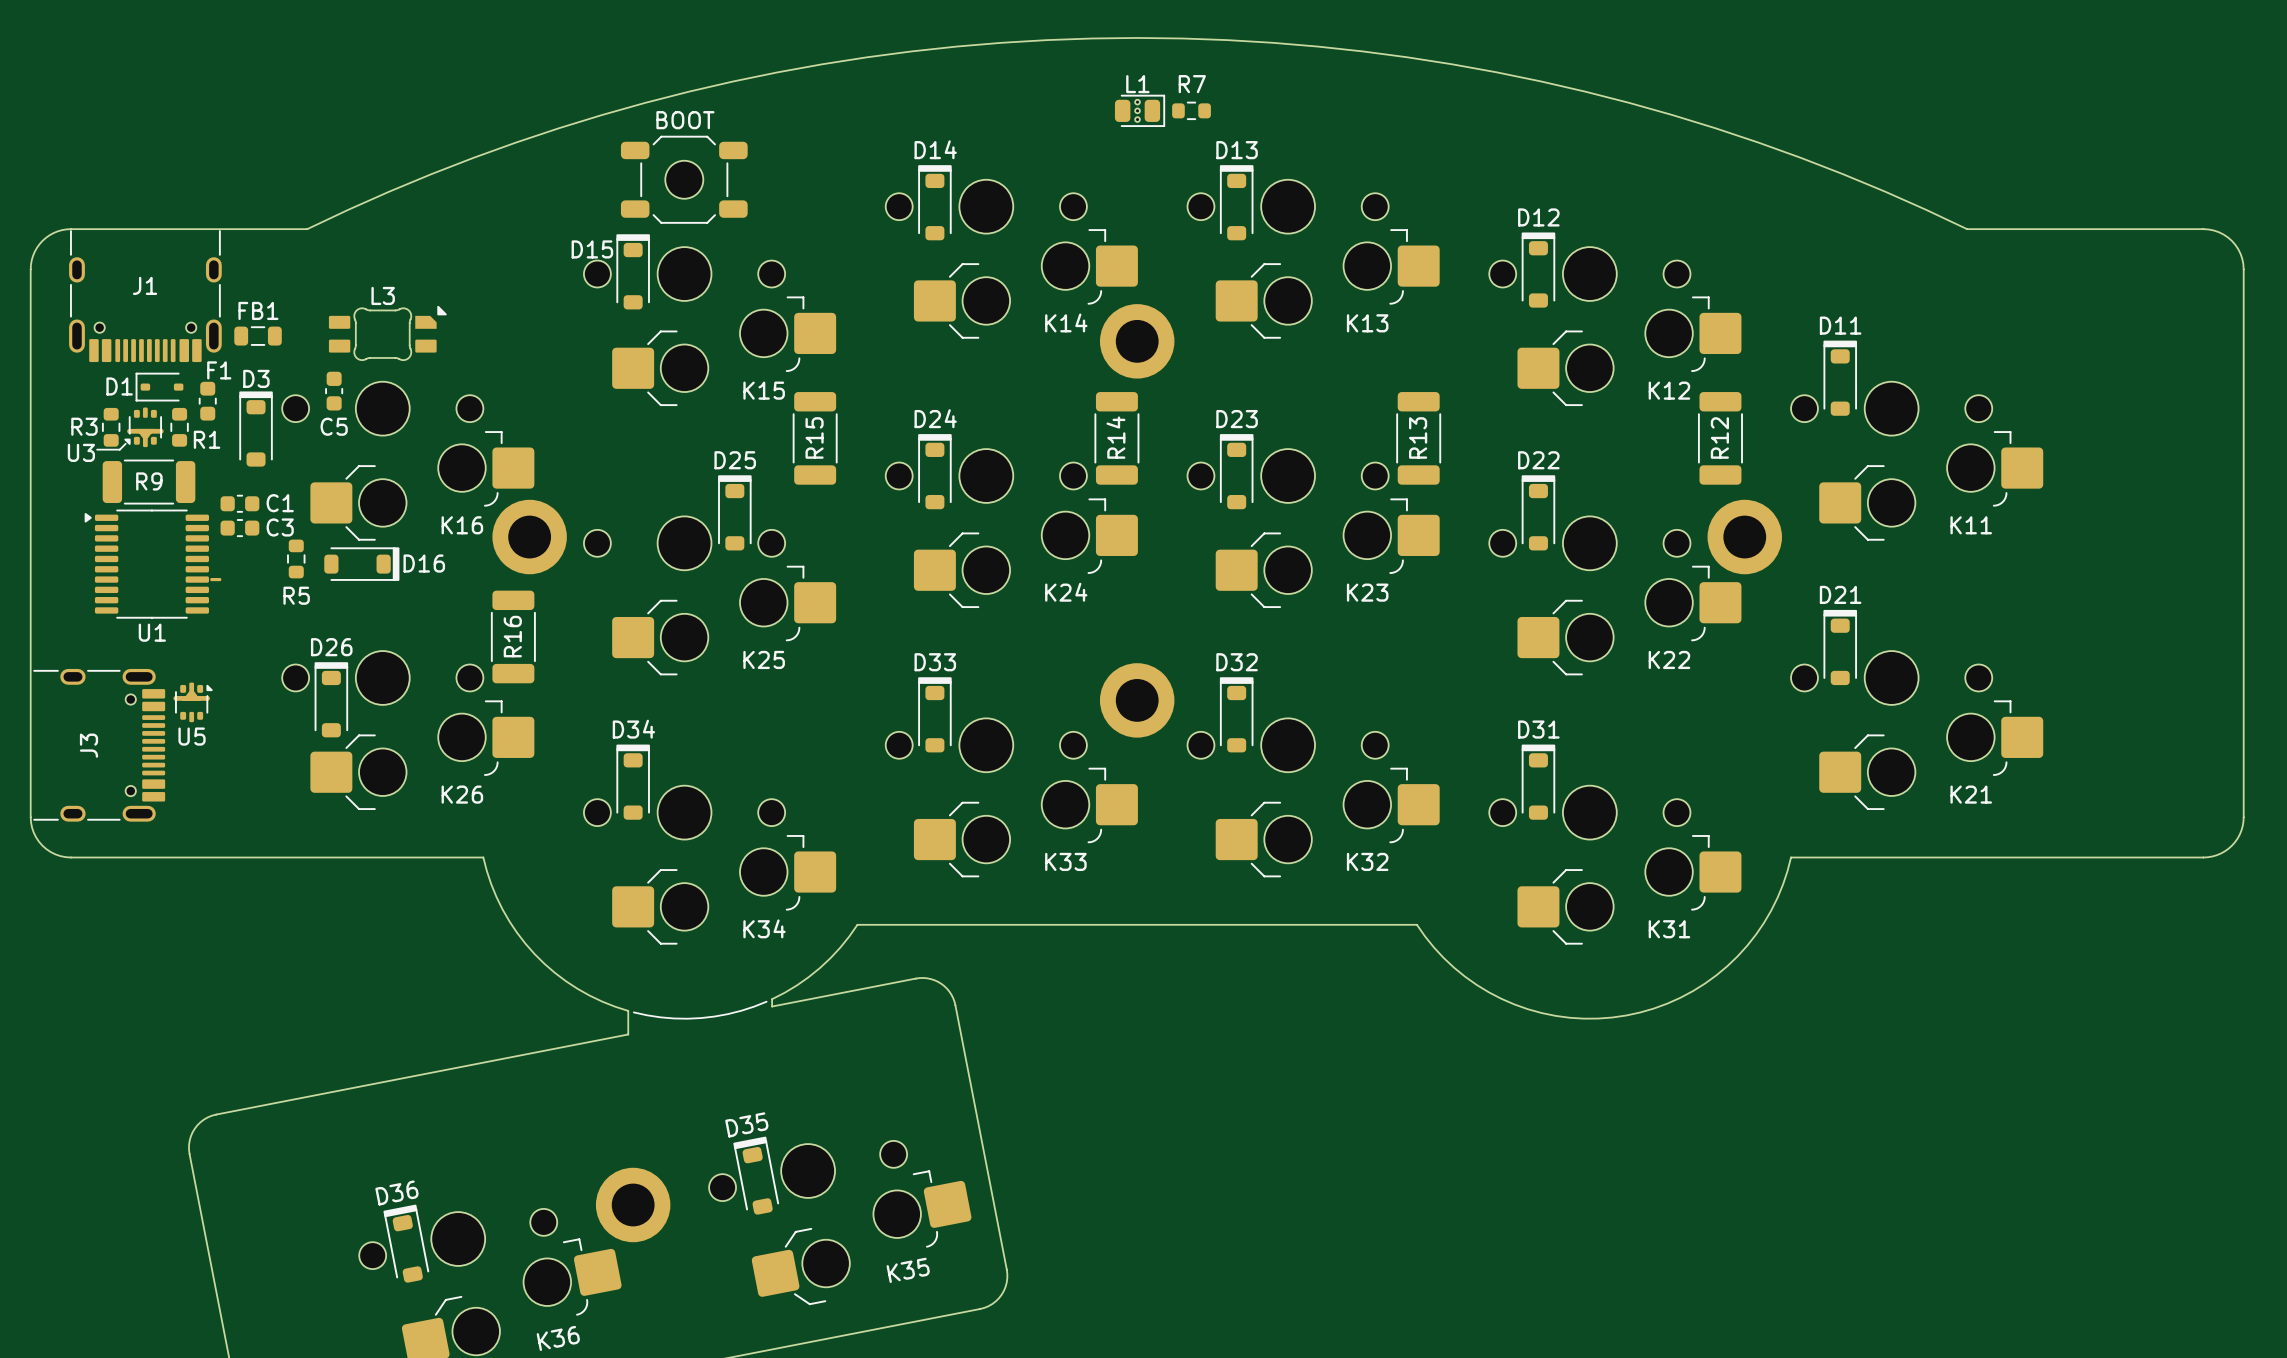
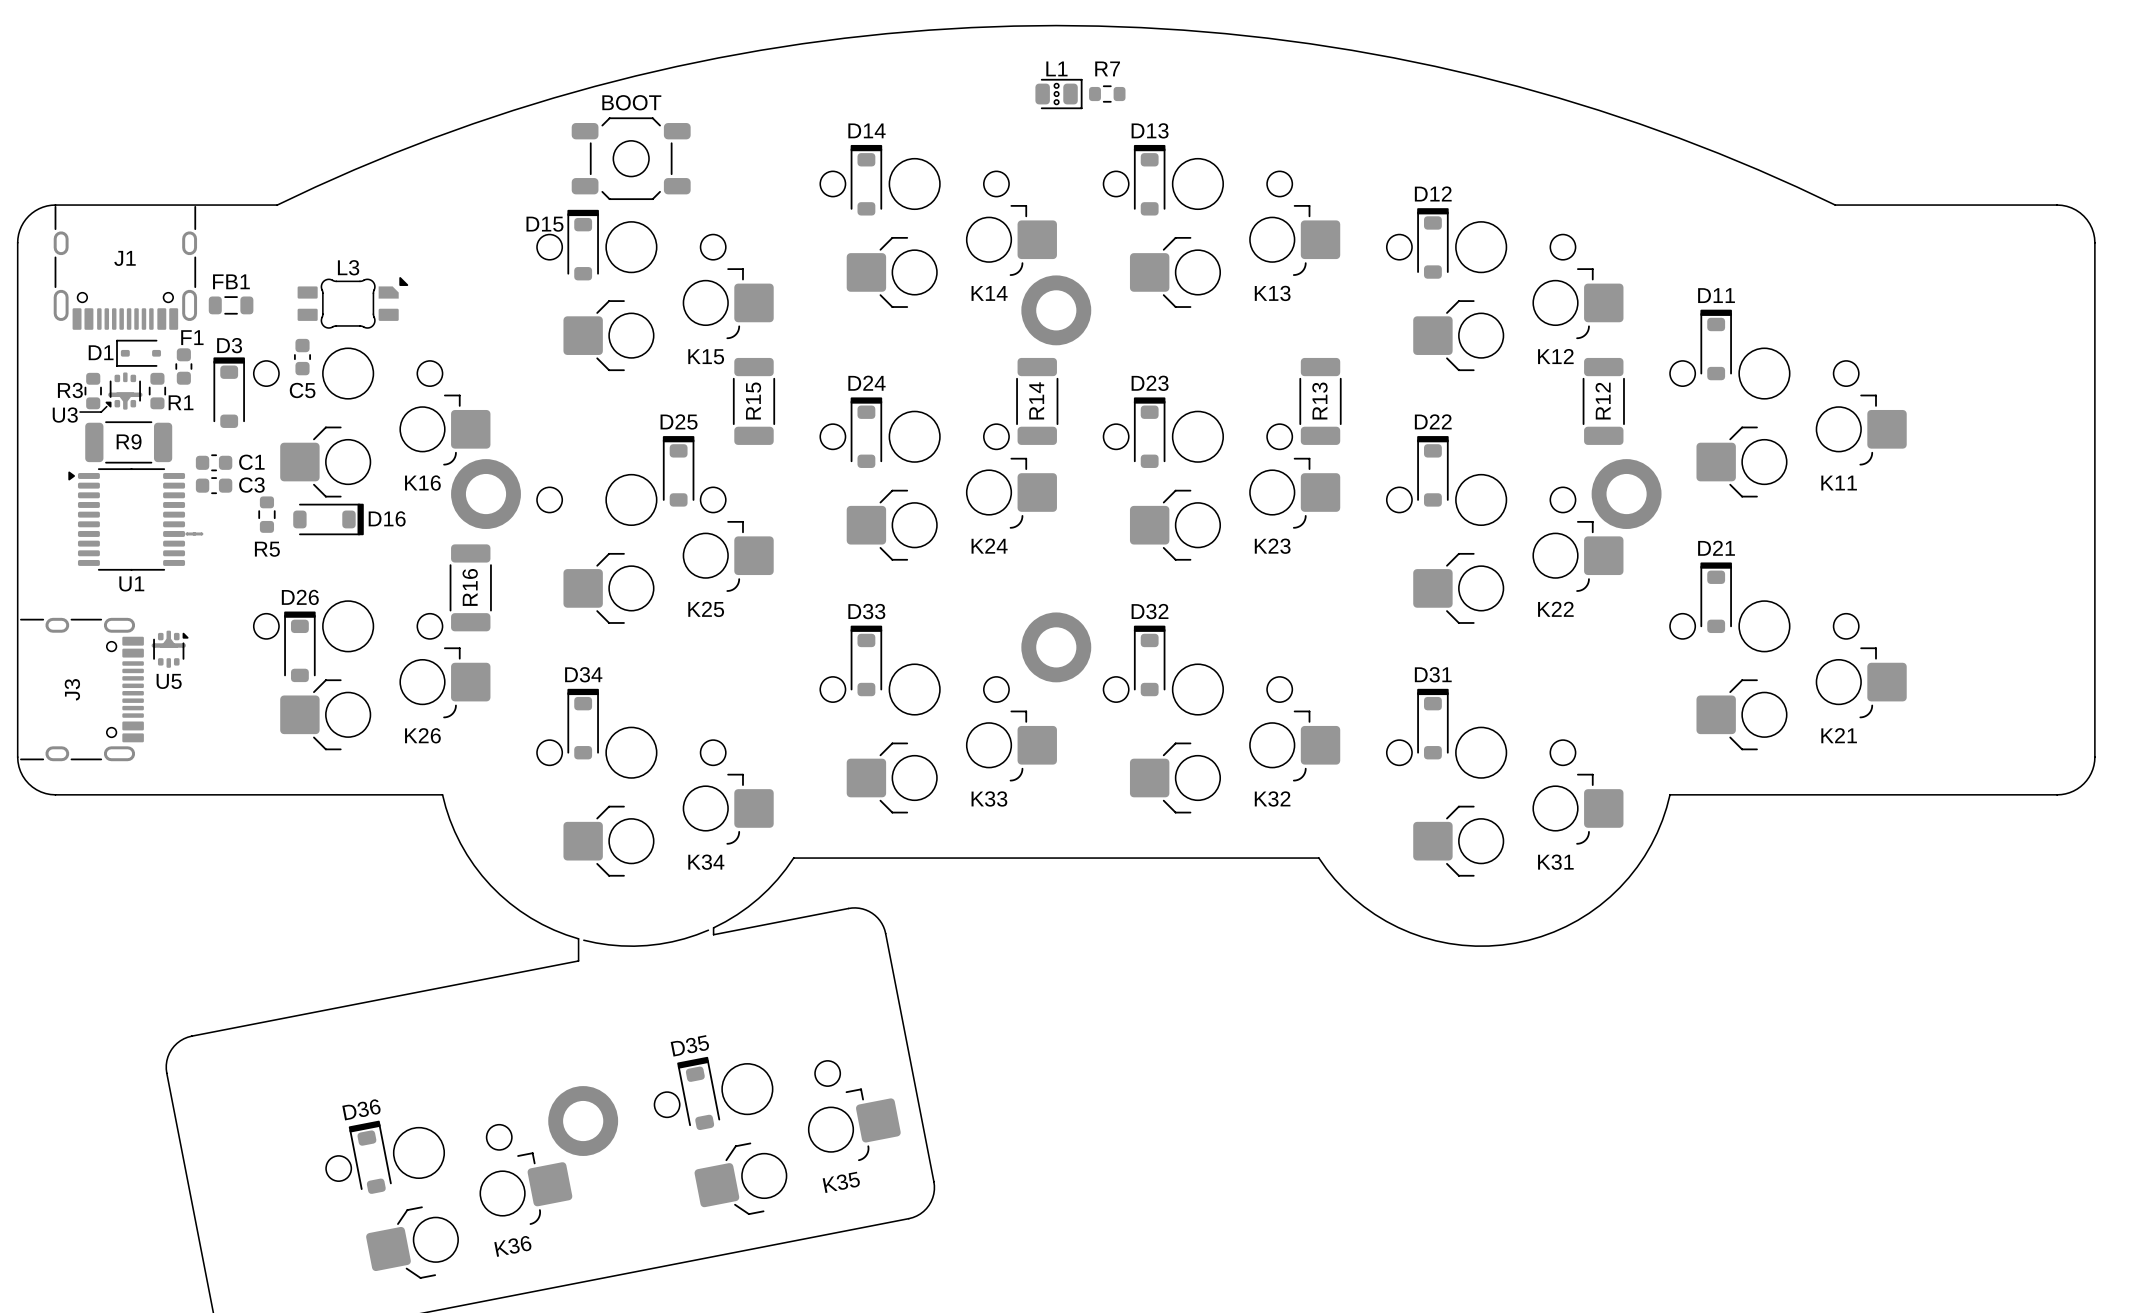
part footprint: [210, 577, 222, 582] -> [185, 532, 204, 536]

